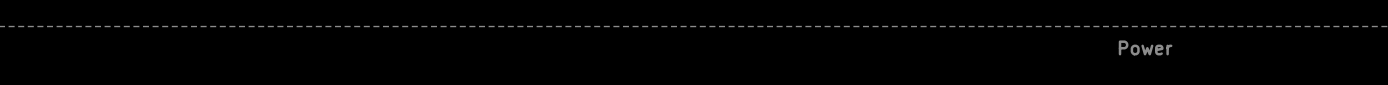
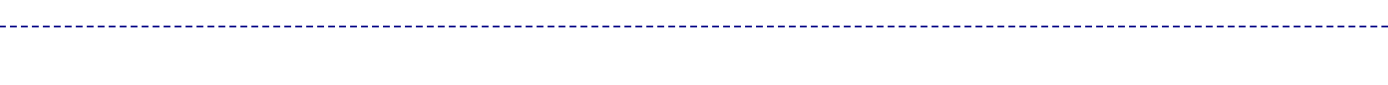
text: Power (1145, 47) -> none

